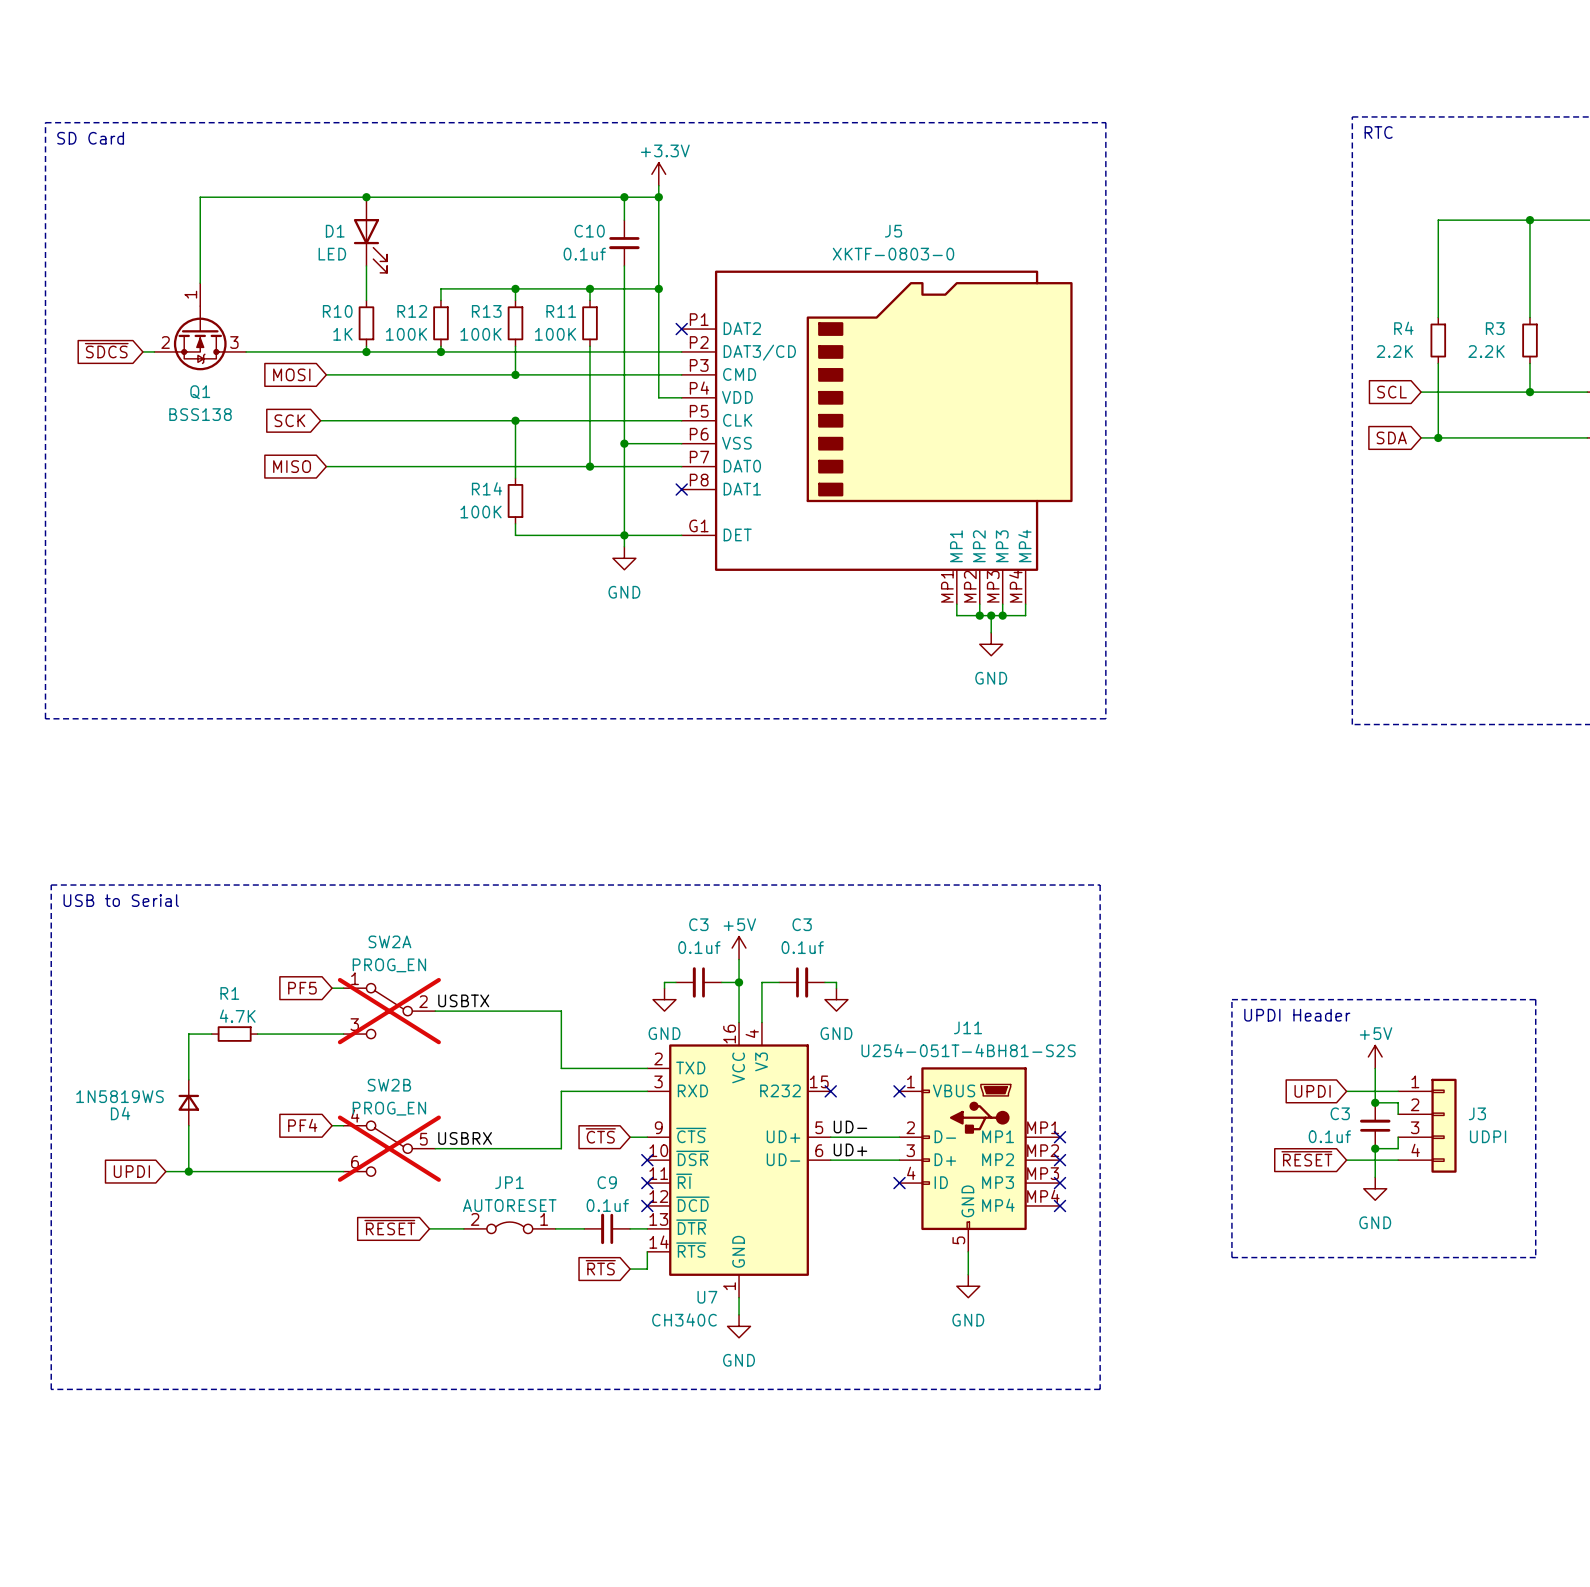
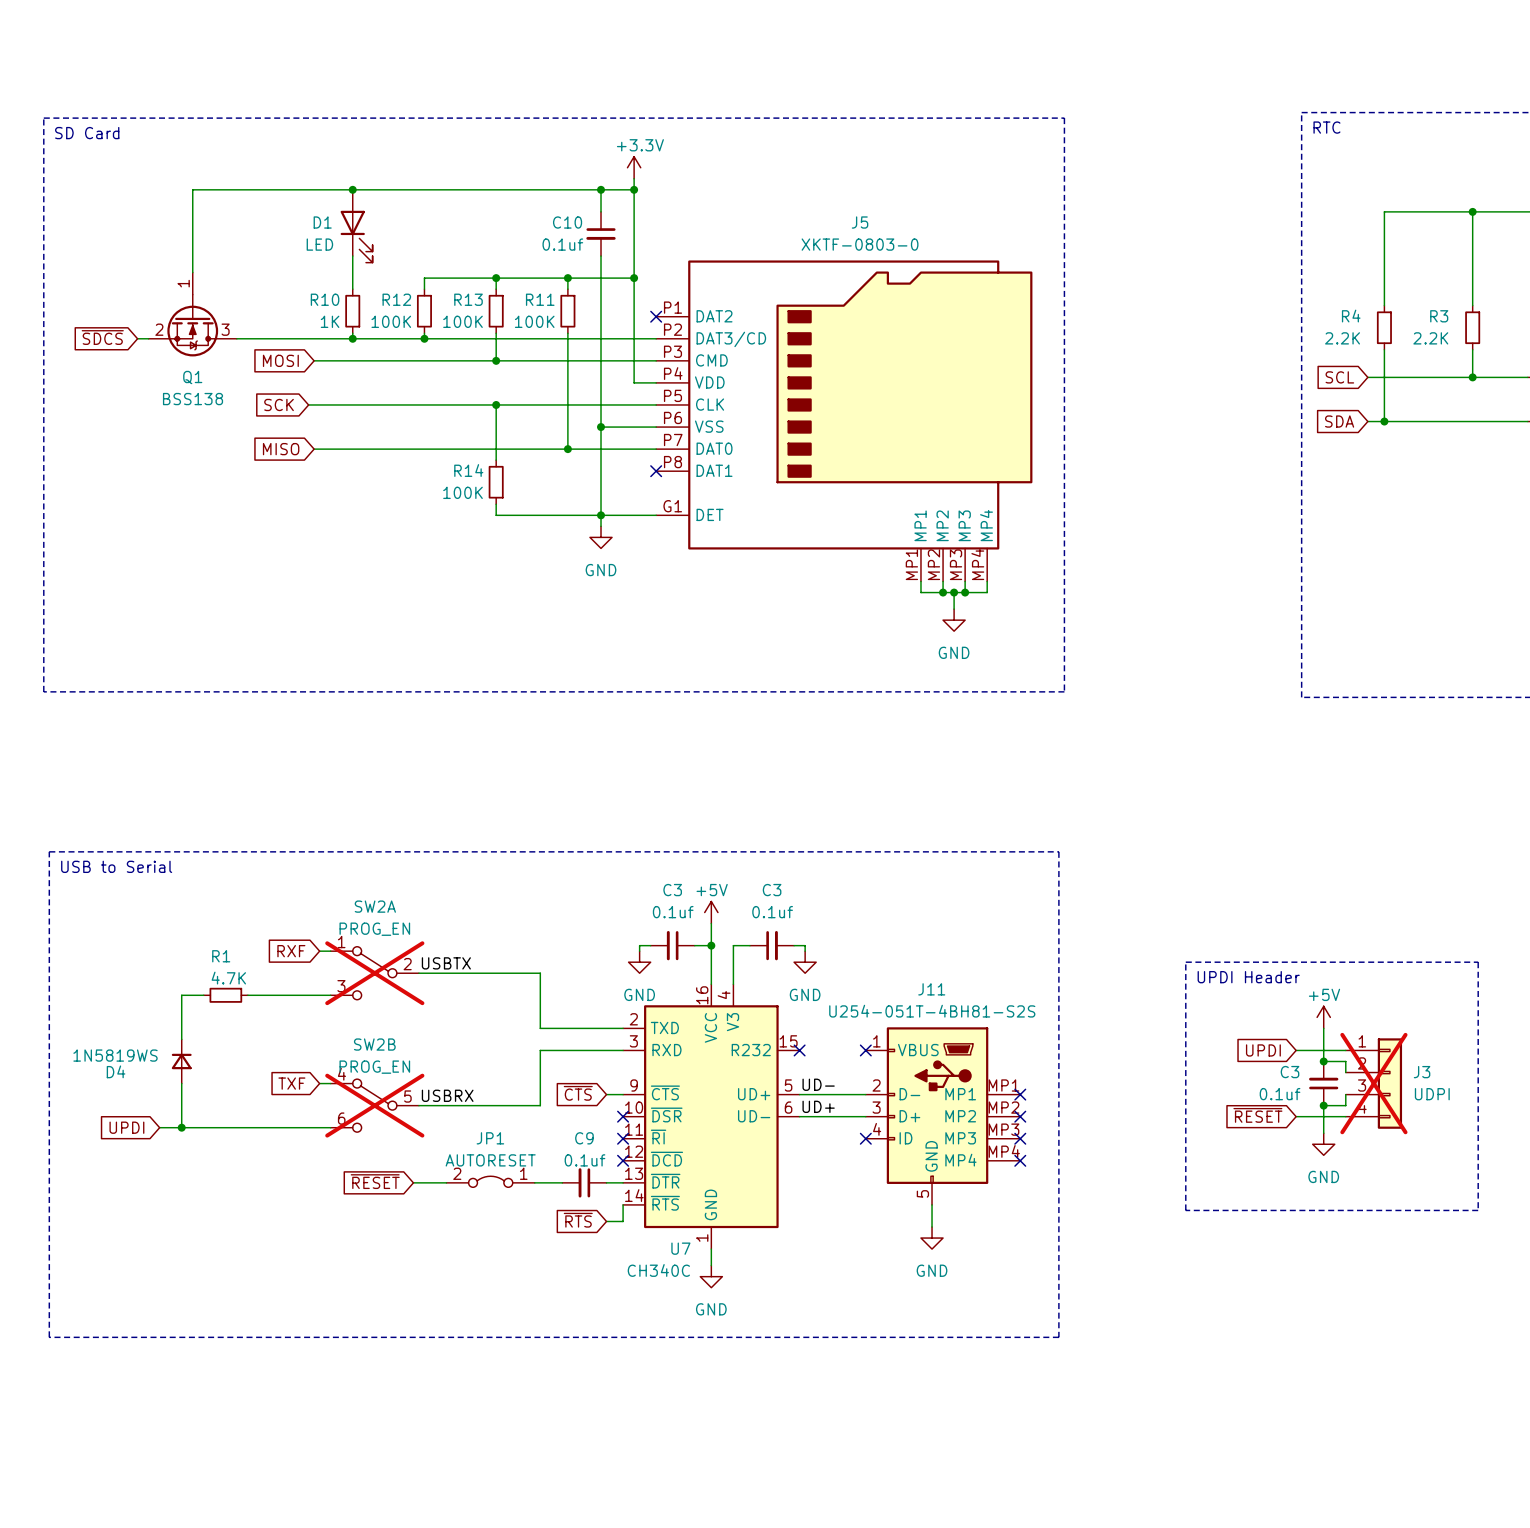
global label: PF5 (302, 988) -> RXF (291, 951)
global label: PF4 (302, 1125) -> TXF (291, 1083)
J3 do-not-place cross: none -> (1373, 1083)

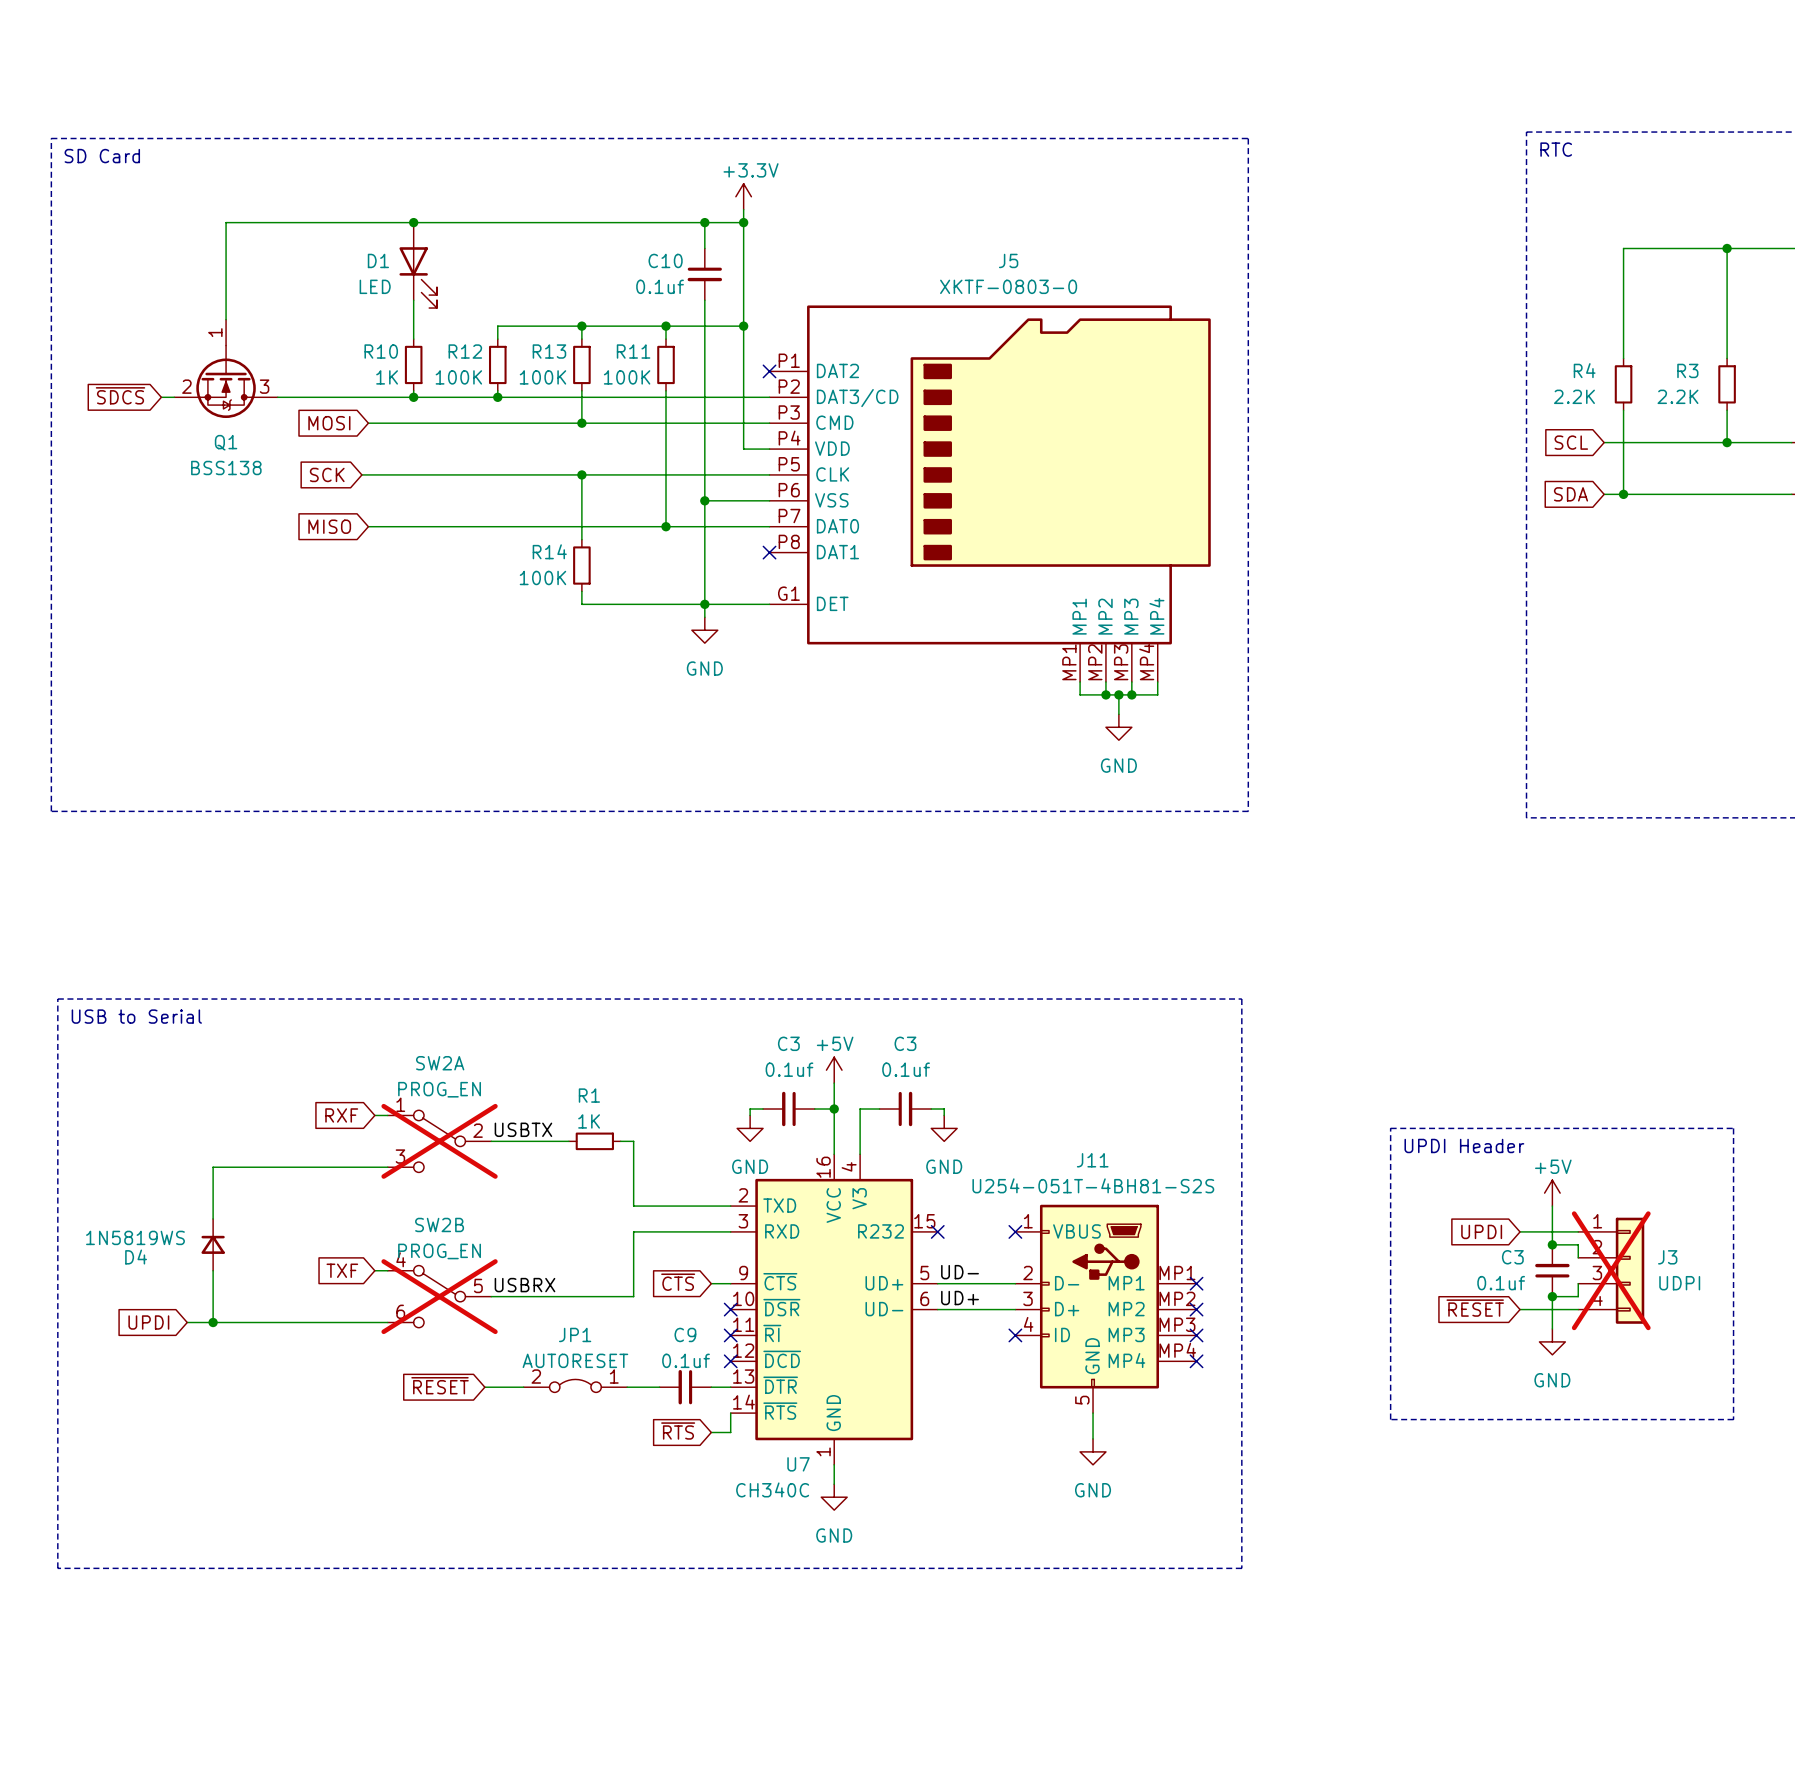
wire: (485, 973) (529, 973) -> none
R1 value: 4.7K (228, 978) -> 1K (589, 1121)
wire: none -> (238, 1167) (290, 1167)
R1 position: (225, 995) -> (594, 1141)

